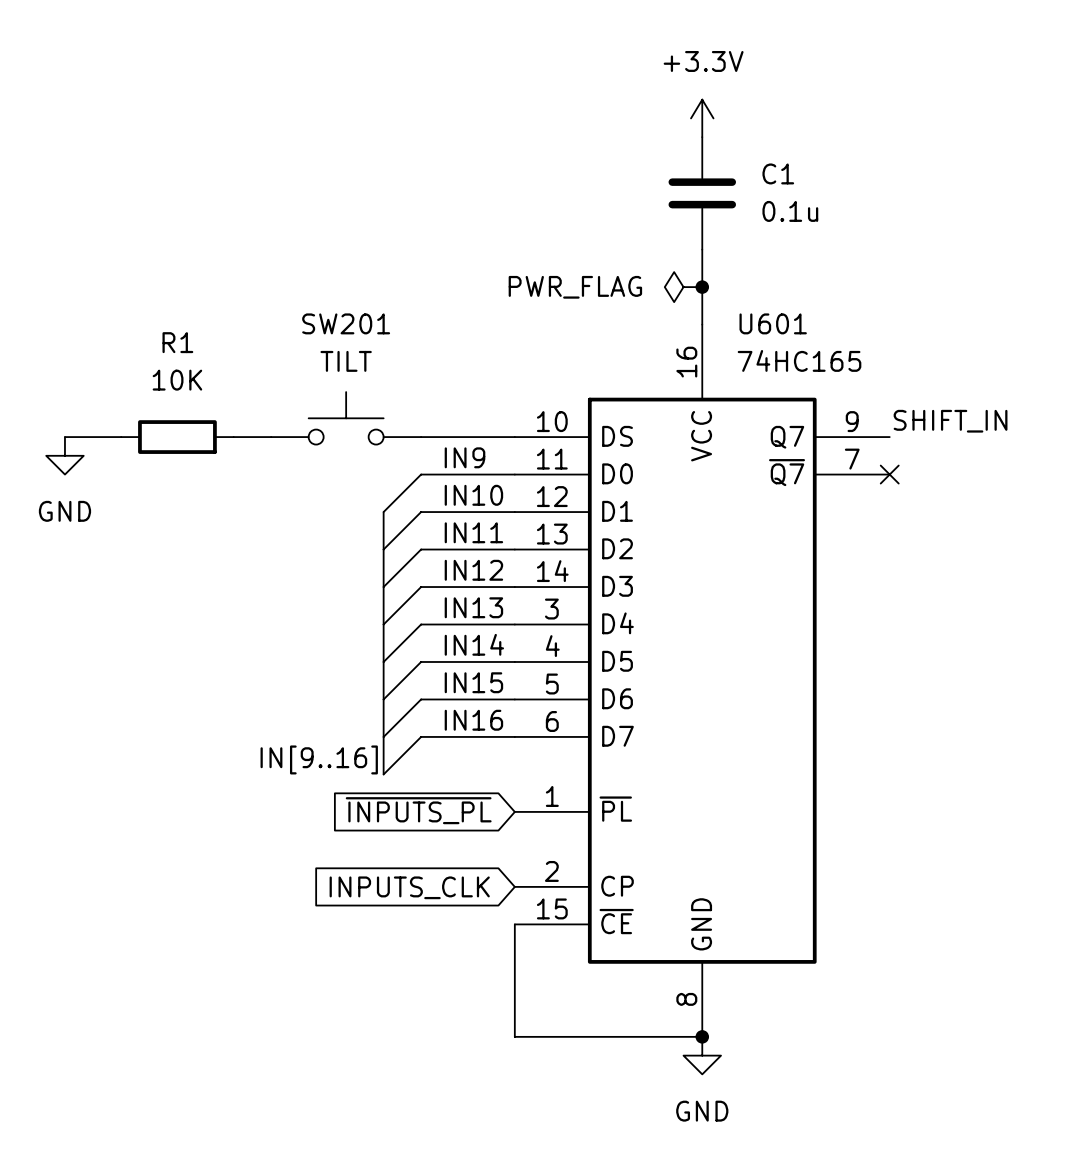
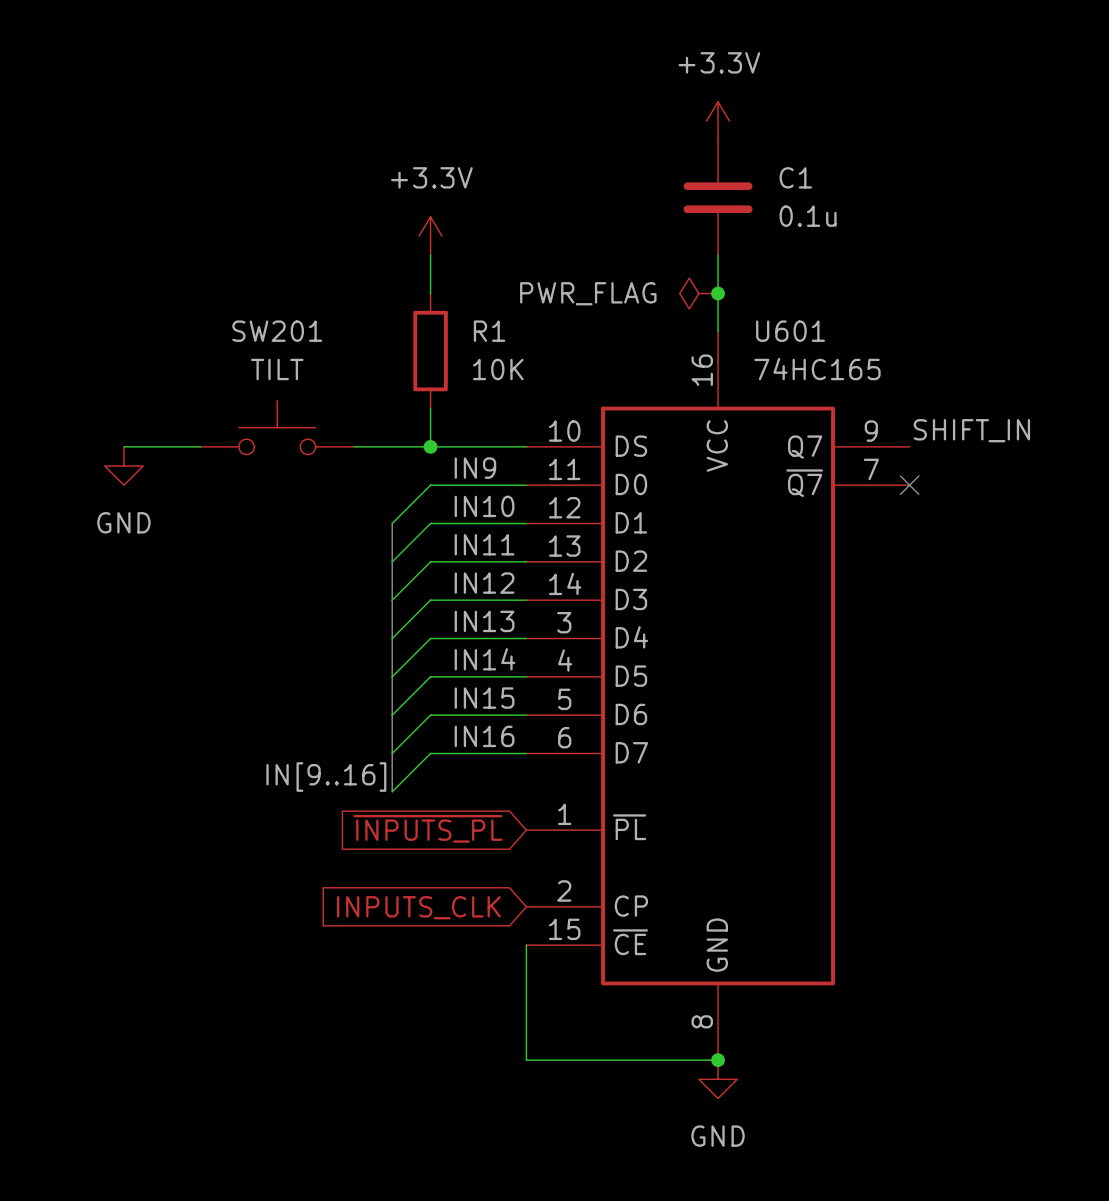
power symbol: none -> +3.3V (430, 236)
wire: none -> (430, 255) (430, 293)
R1 name position: R1 (177, 342) -> R1 (489, 331)
wire: none -> (430, 408) (430, 446) (353, 446)
SW201 position: (346, 418) -> (277, 427)
wire: (64, 437) (121, 437) -> (200, 446) (123, 446)
R1 rotation: 0° (177, 437) -> 90° clockwise (430, 351)
R1 position: (177, 437) -> (430, 351)
wire: (233, 437) (271, 437) -> none
junction: none -> (430, 446)
power symbol position: GND (64, 455) -> GND (123, 466)

